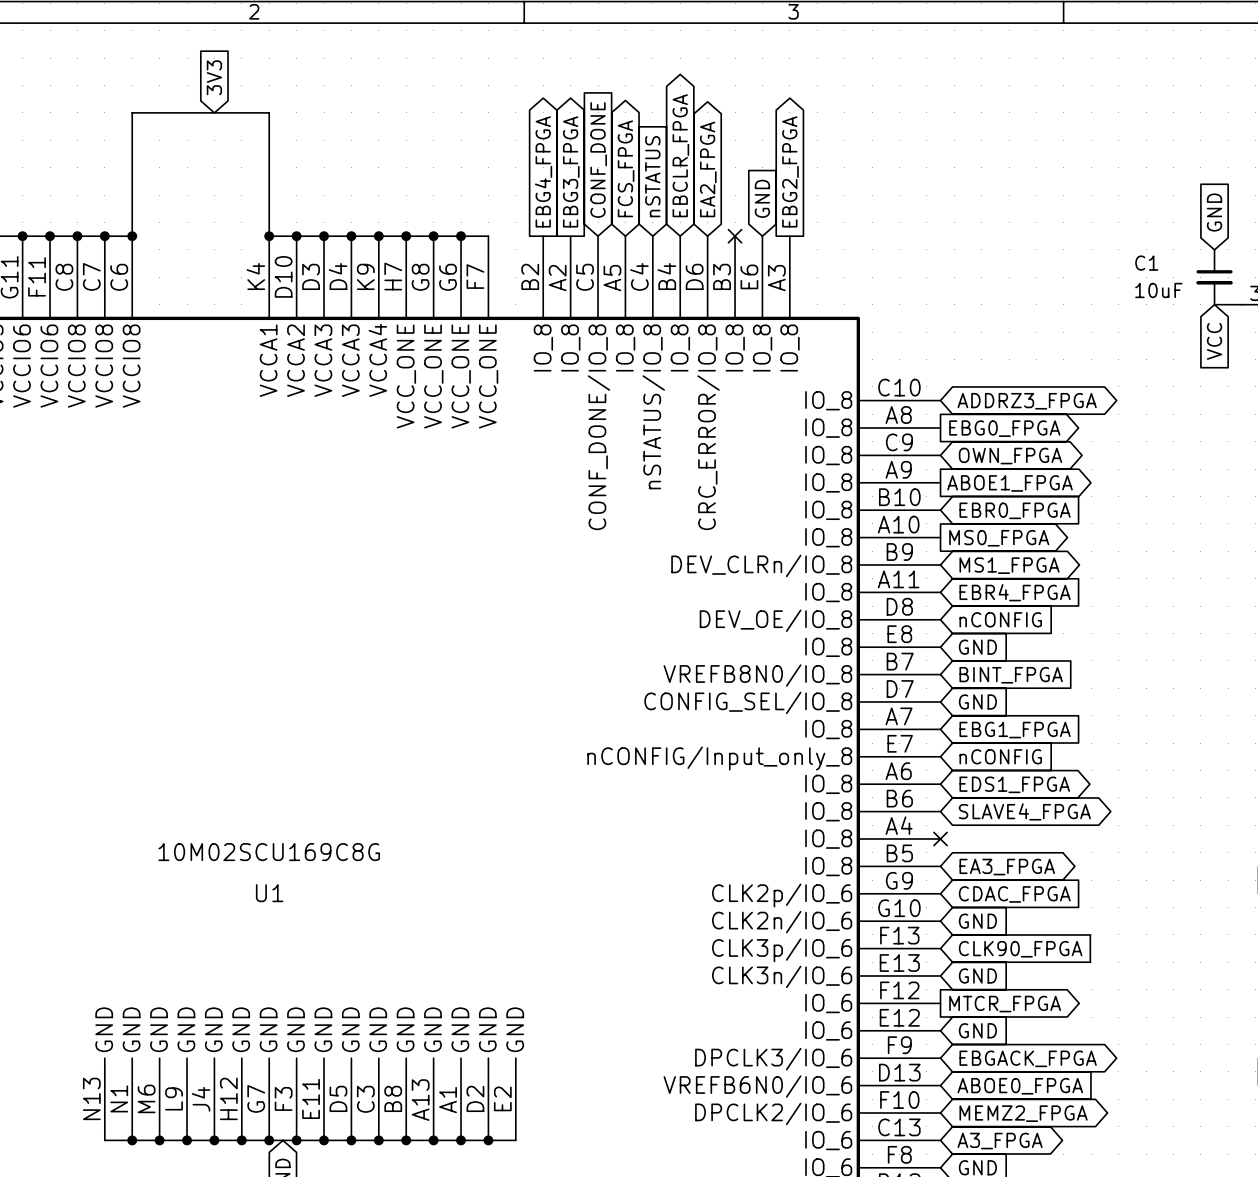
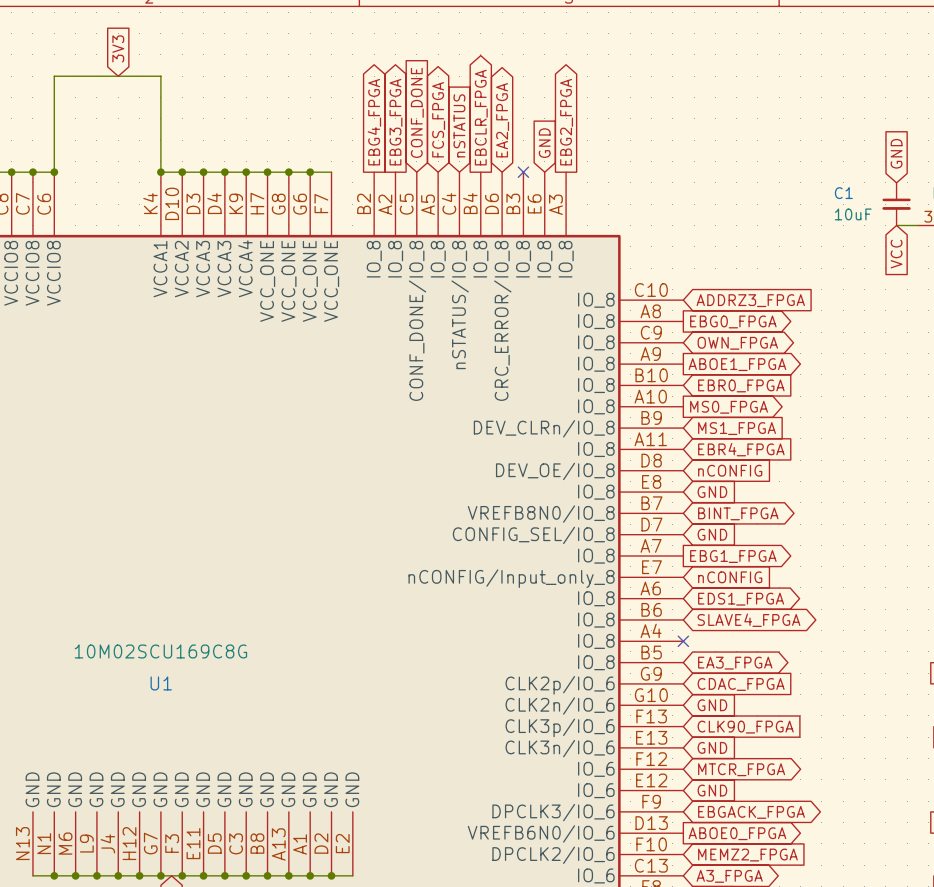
global label shape: bidirectional (680, 155) -> output (481, 117)
global label shape: bidirectional (1027, 401) -> input (750, 300)
global label shape: bidirectional (1009, 565) -> input (737, 428)
global label shape: input (1011, 675) -> bidirectional (738, 513)
global label shape: input (1015, 730) -> output (733, 556)
global label shape: output (1005, 1004) -> bidirectional (741, 769)
global label shape: input (1020, 1086) -> output (737, 833)
global label shape: bidirectional (1023, 1113) -> input (747, 855)

